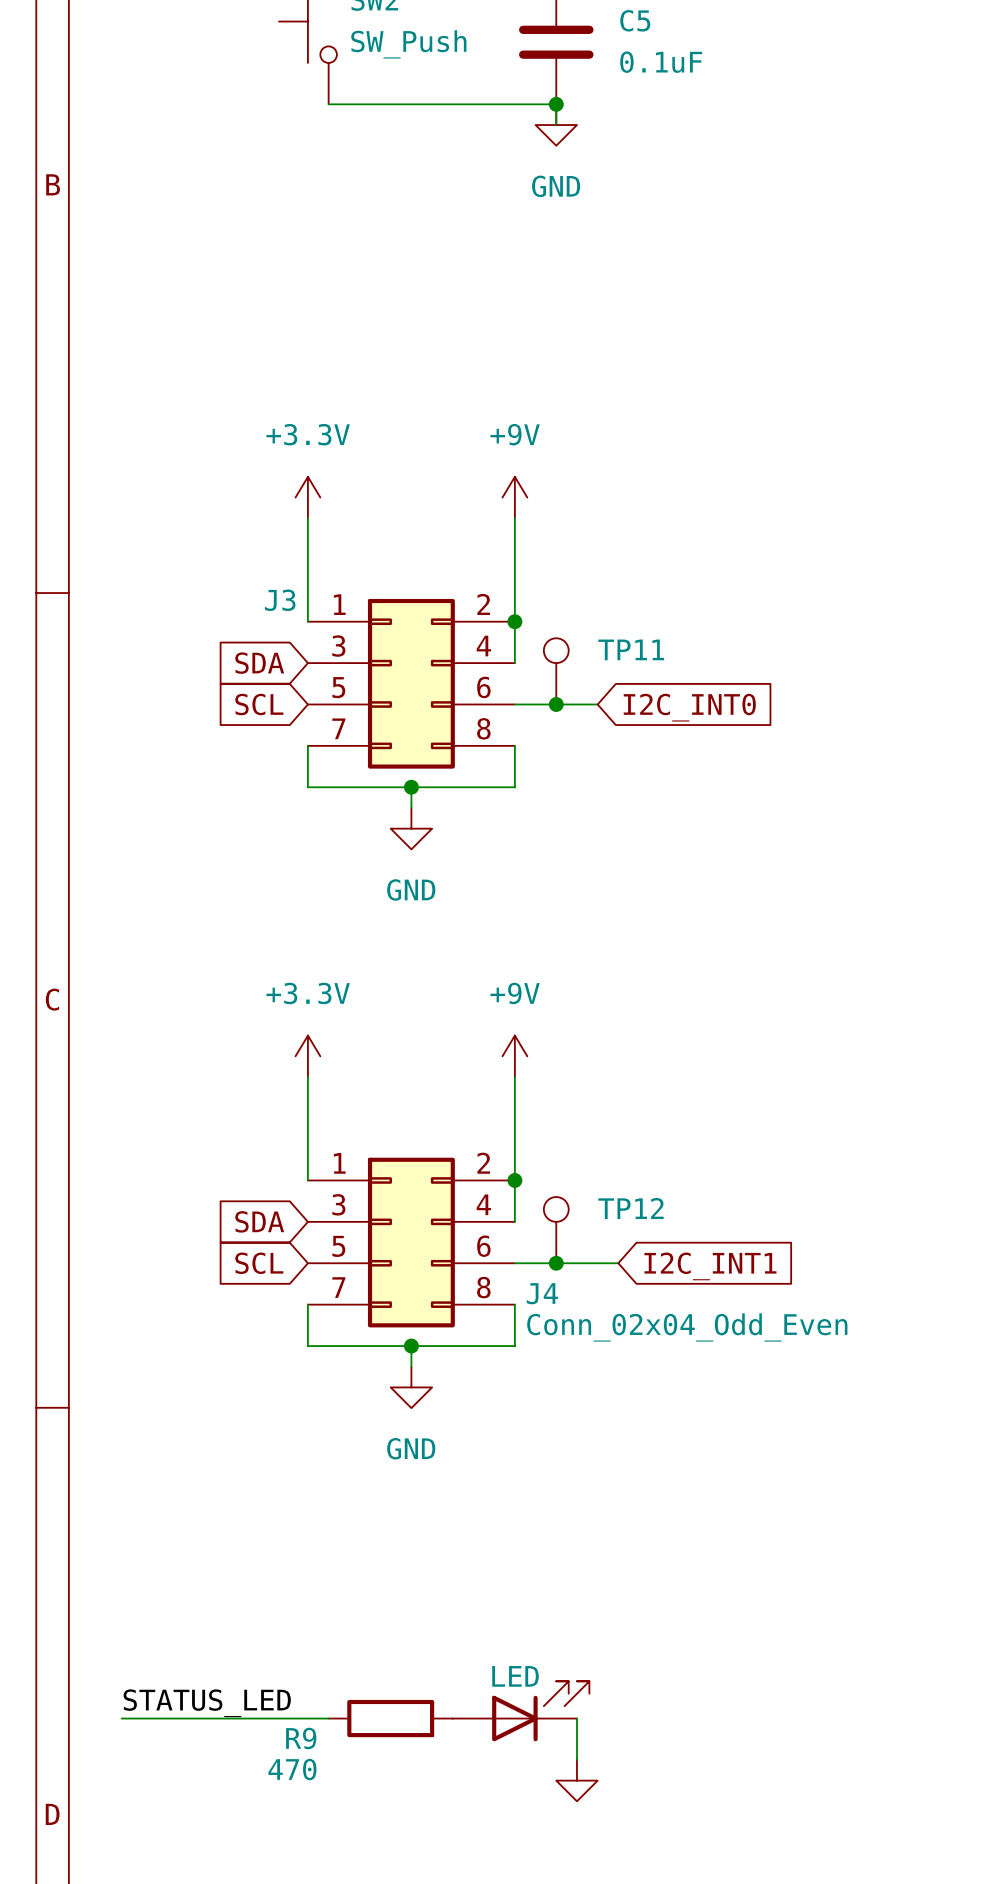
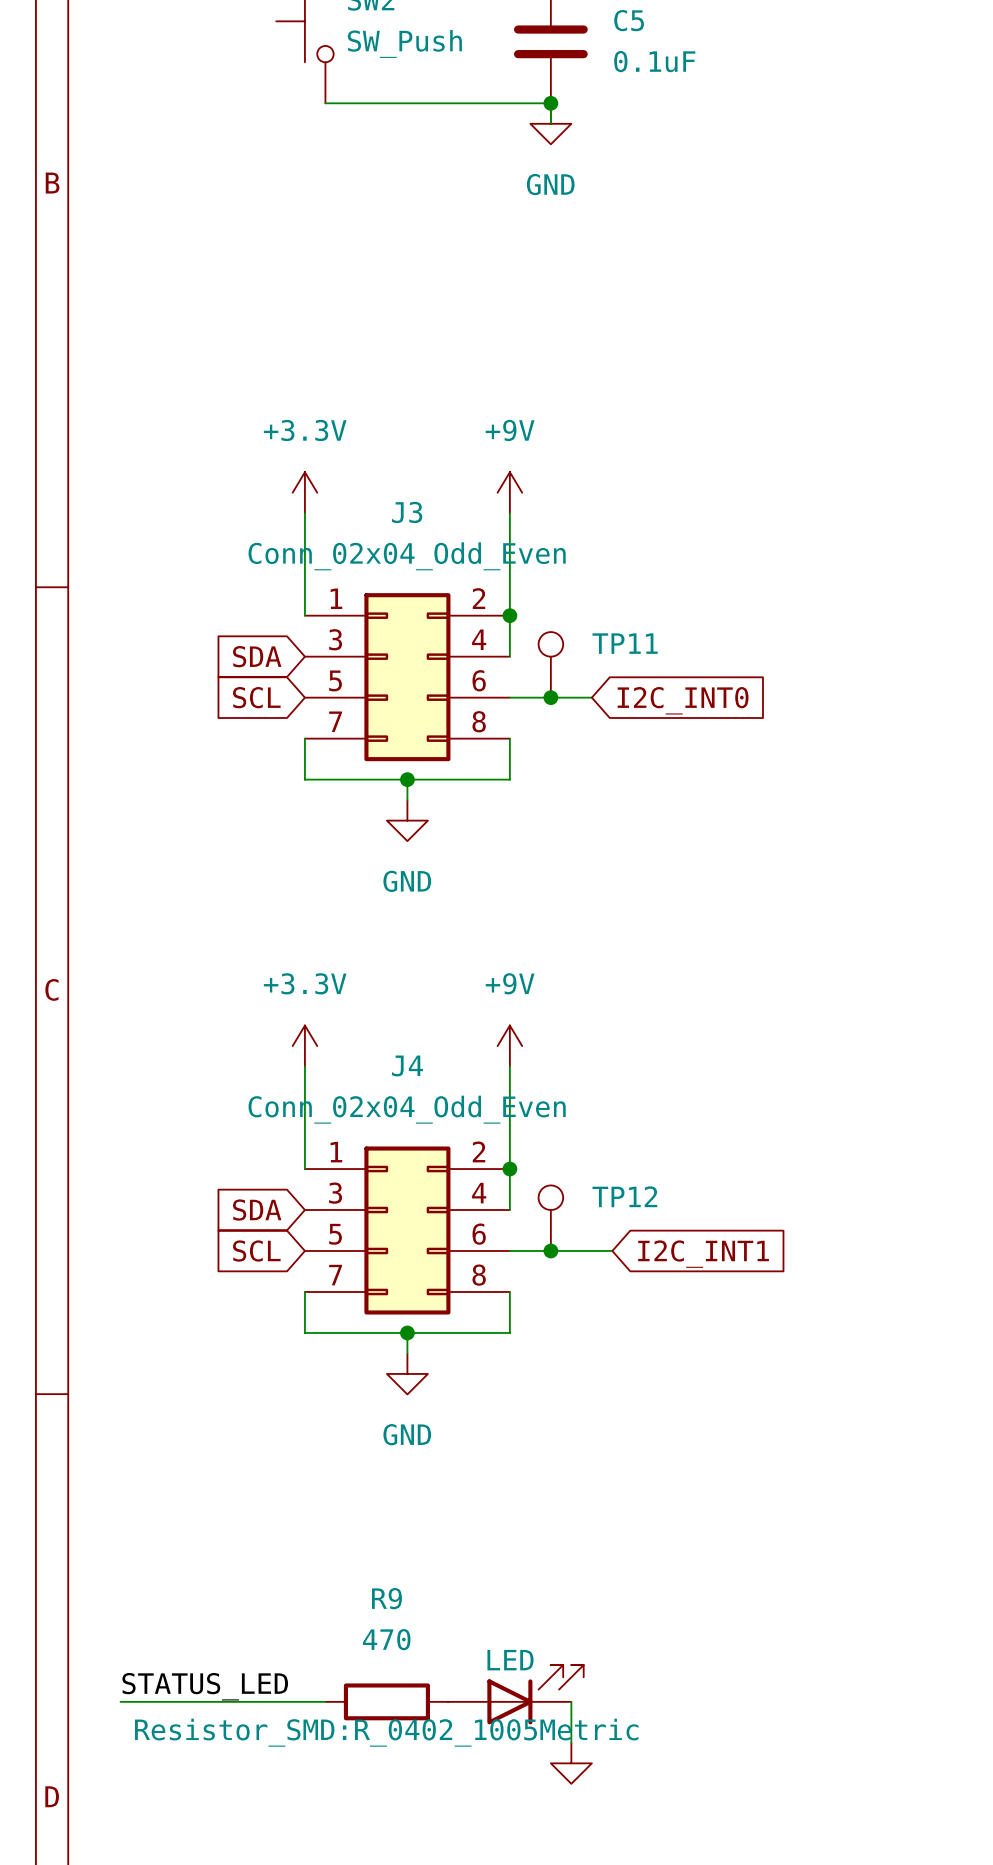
J3 value: none -> Conn_02x04_Odd_Even (407, 556)
J3 name position: J3 (280, 600) -> J3 (407, 512)
J4 name position: J4 (542, 1293) -> J4 (407, 1065)
J4 value position: Conn_02x04_Odd_Even (687, 1327) -> Conn_02x04_Odd_Even (407, 1109)
R9 name position: R9 (301, 1738) -> R9 (386, 1598)
R9 text: none -> Resistor_SMD:R_0402_1005Metric (386, 1732)
R9 value position: 470 (292, 1769) -> 470 (386, 1639)

